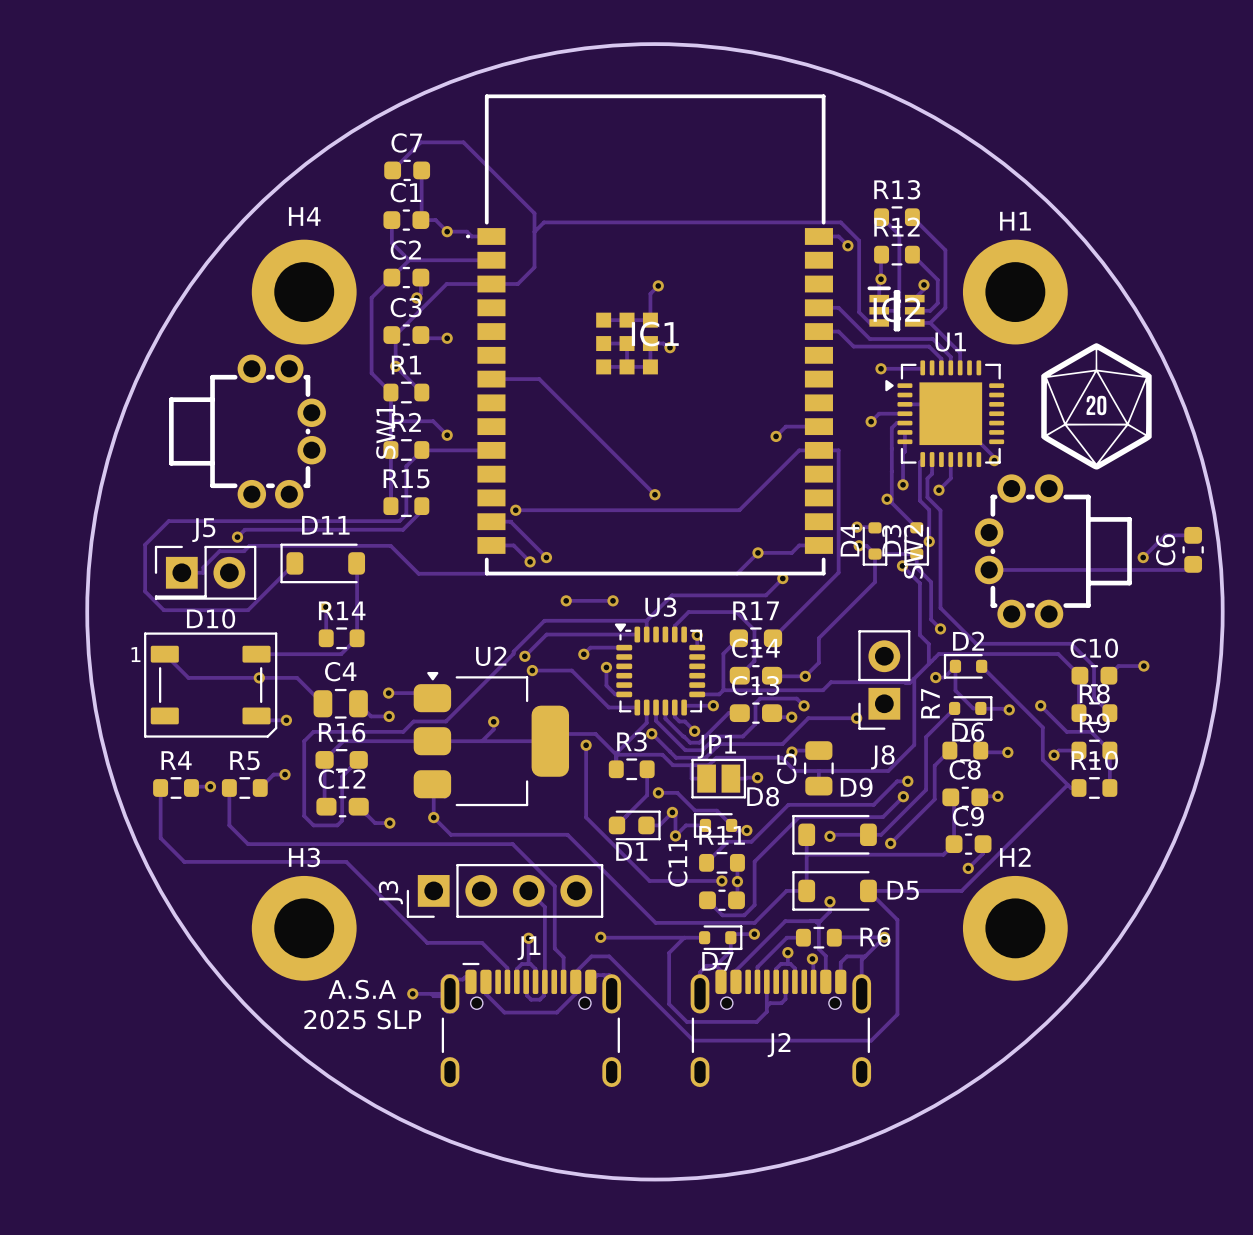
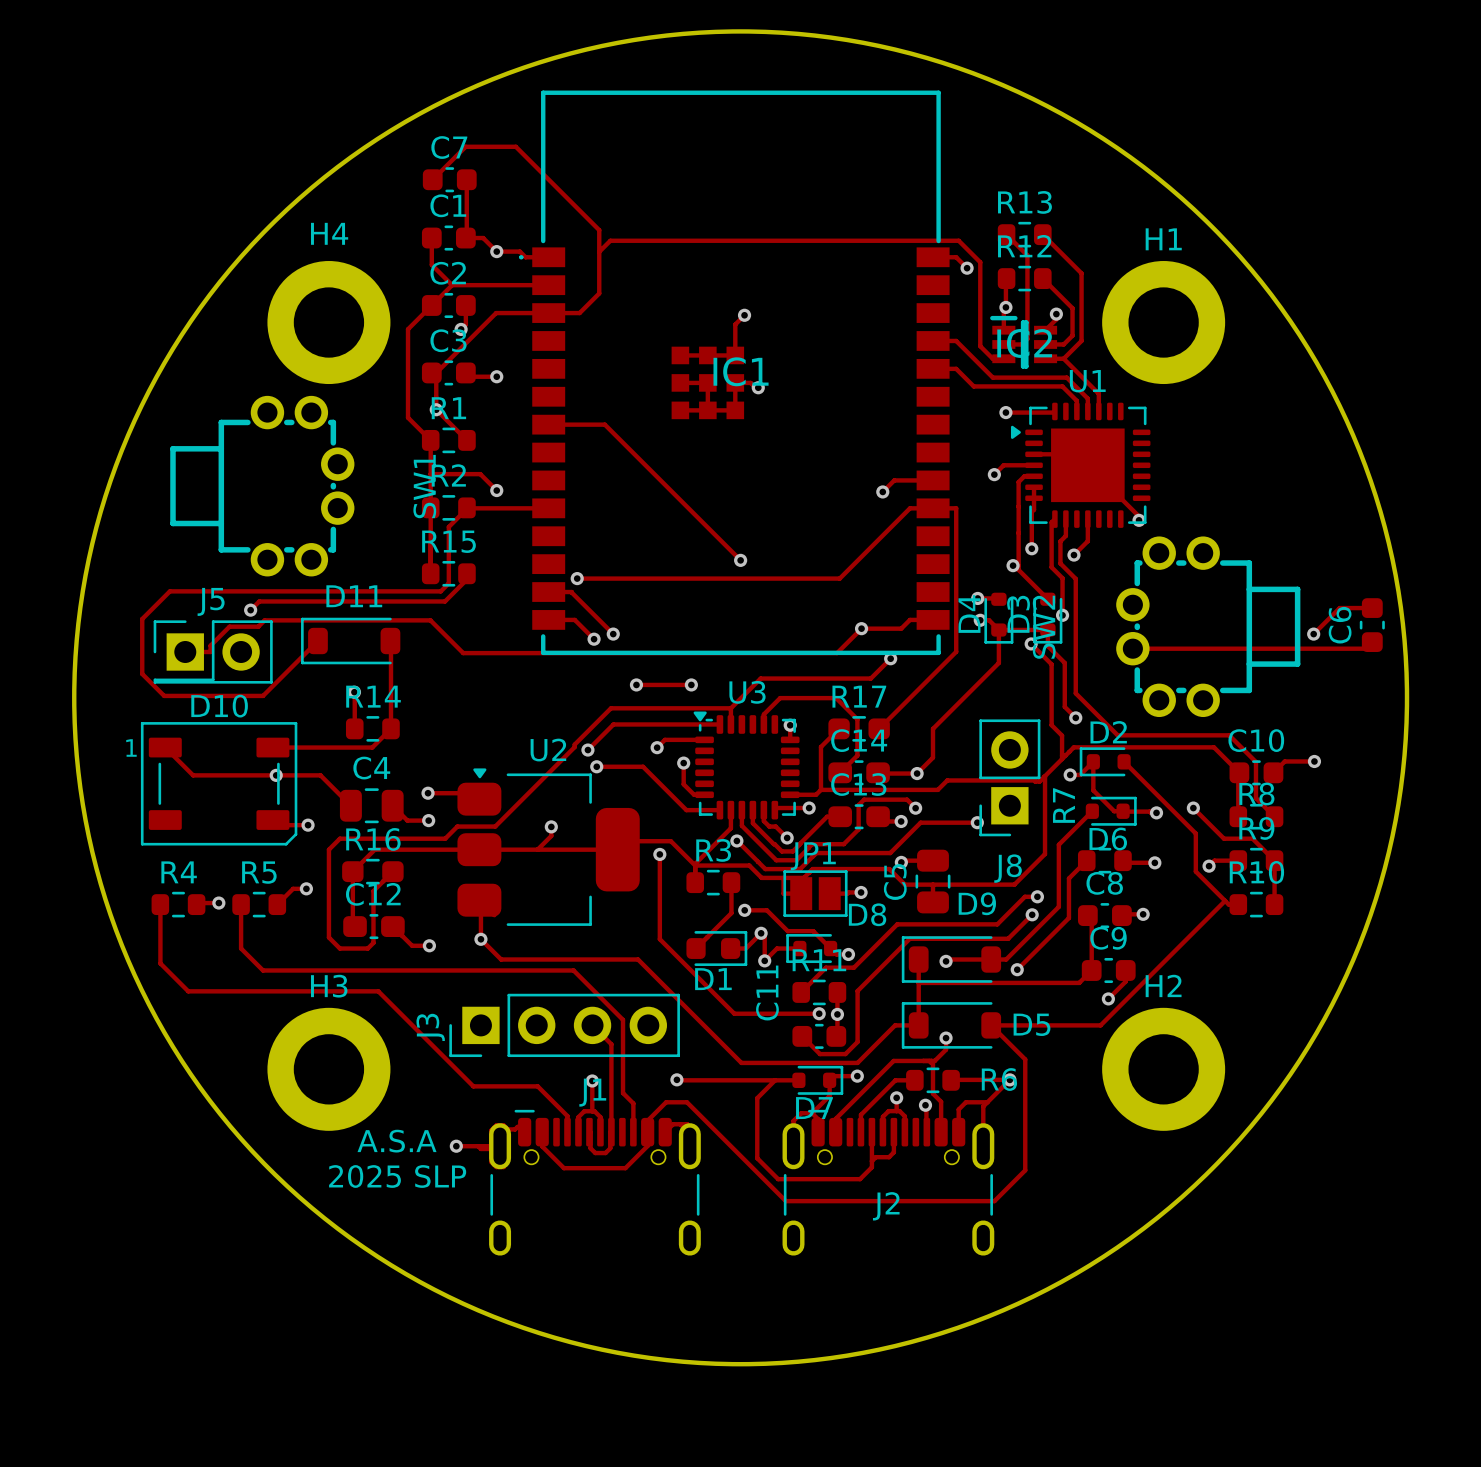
drawing: [1041, 343, 1152, 470] -> none

